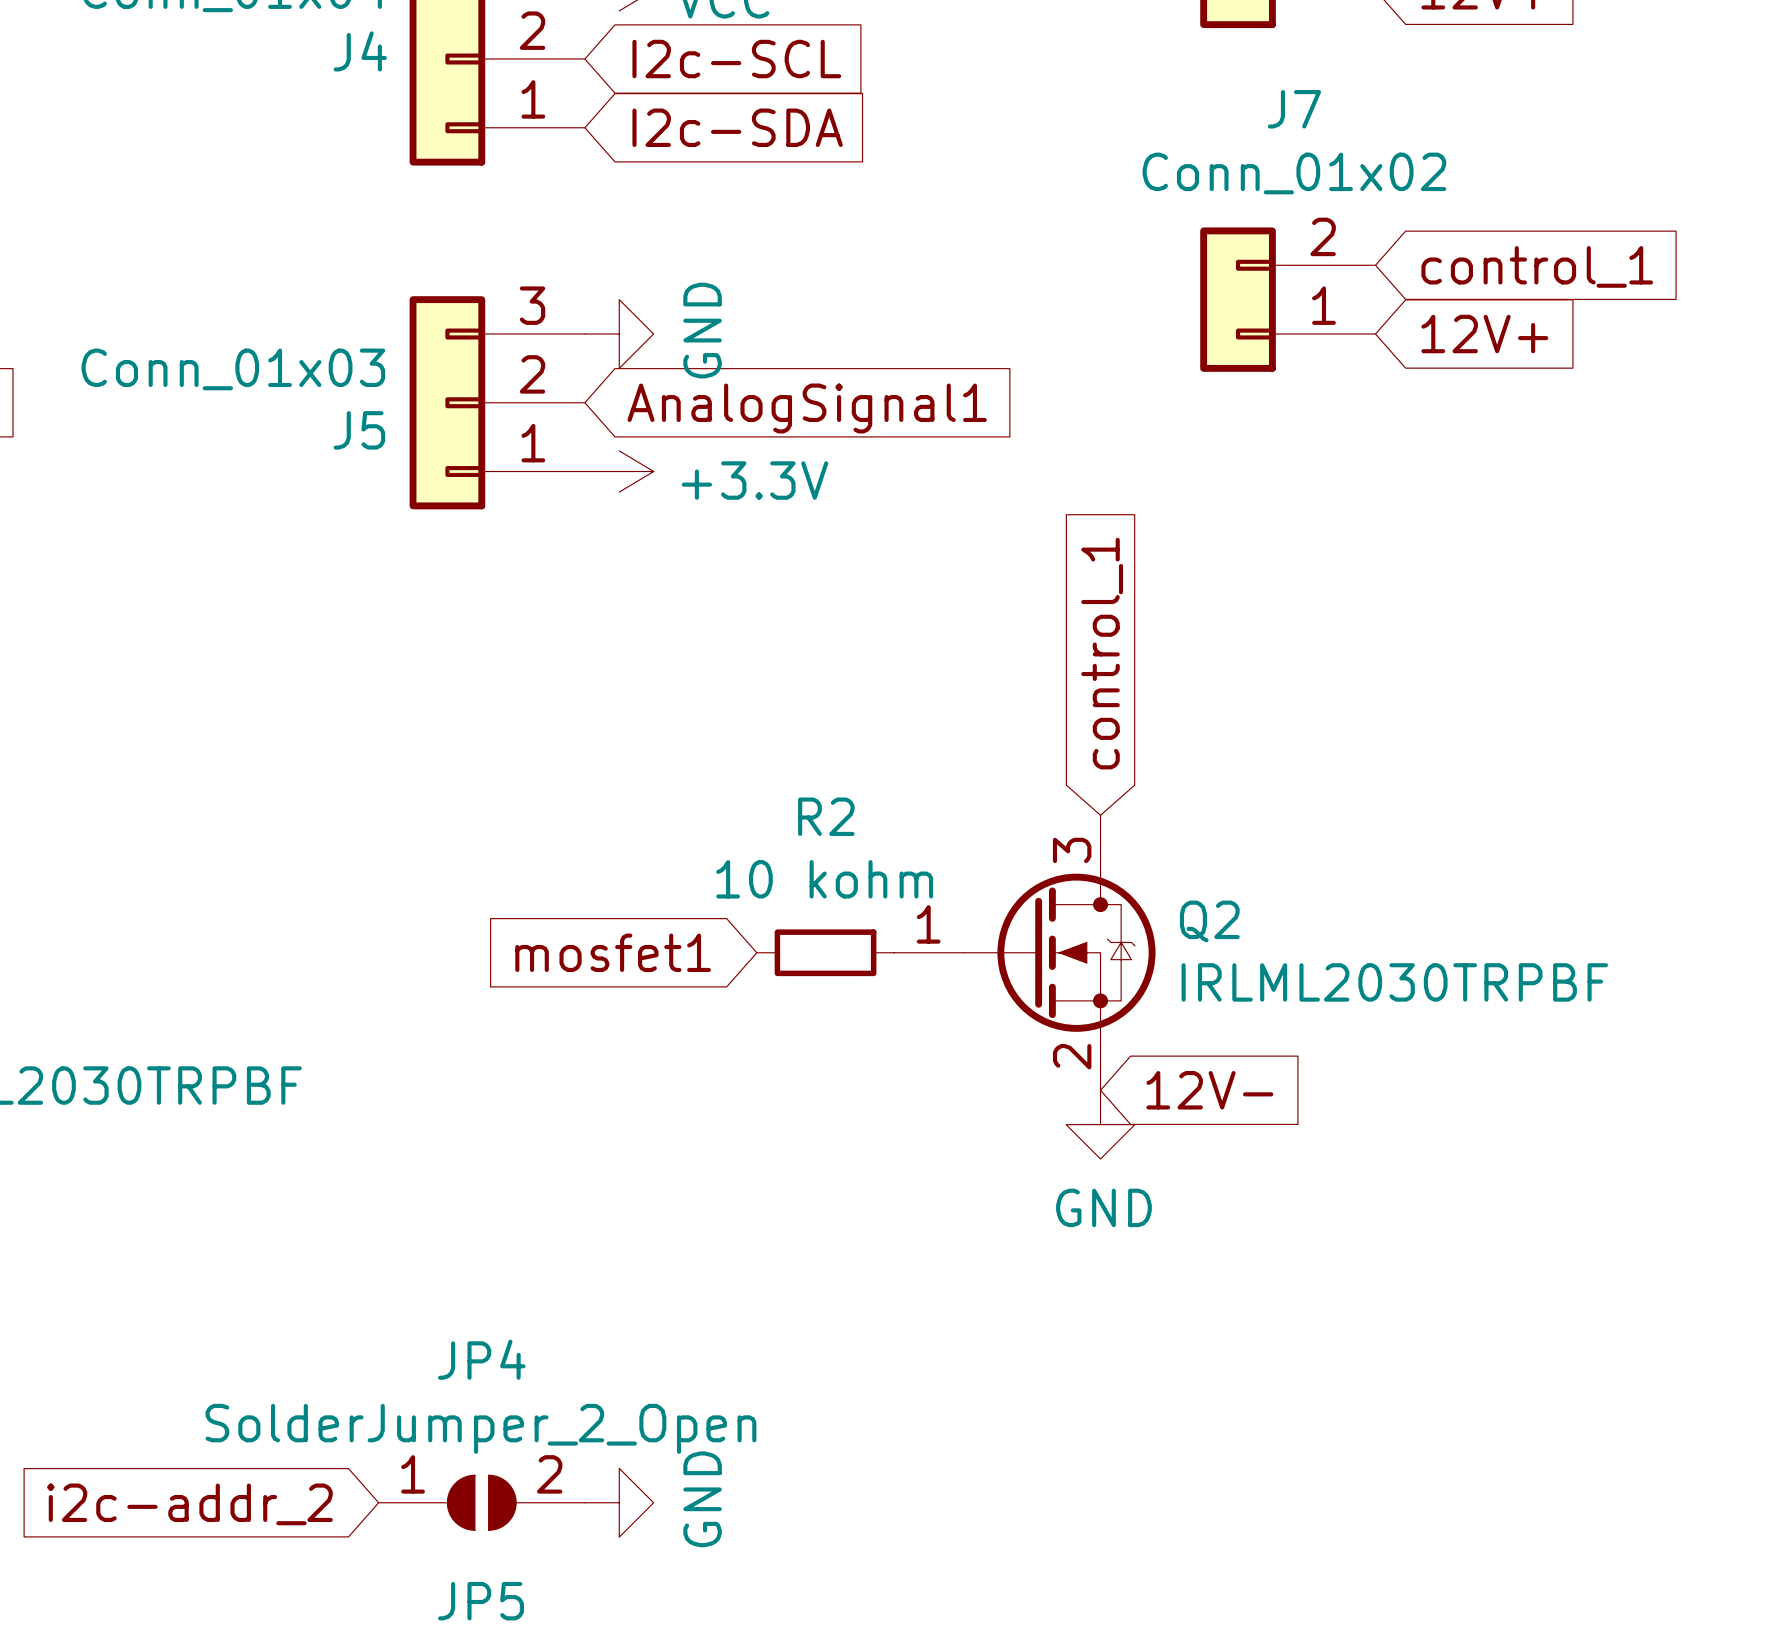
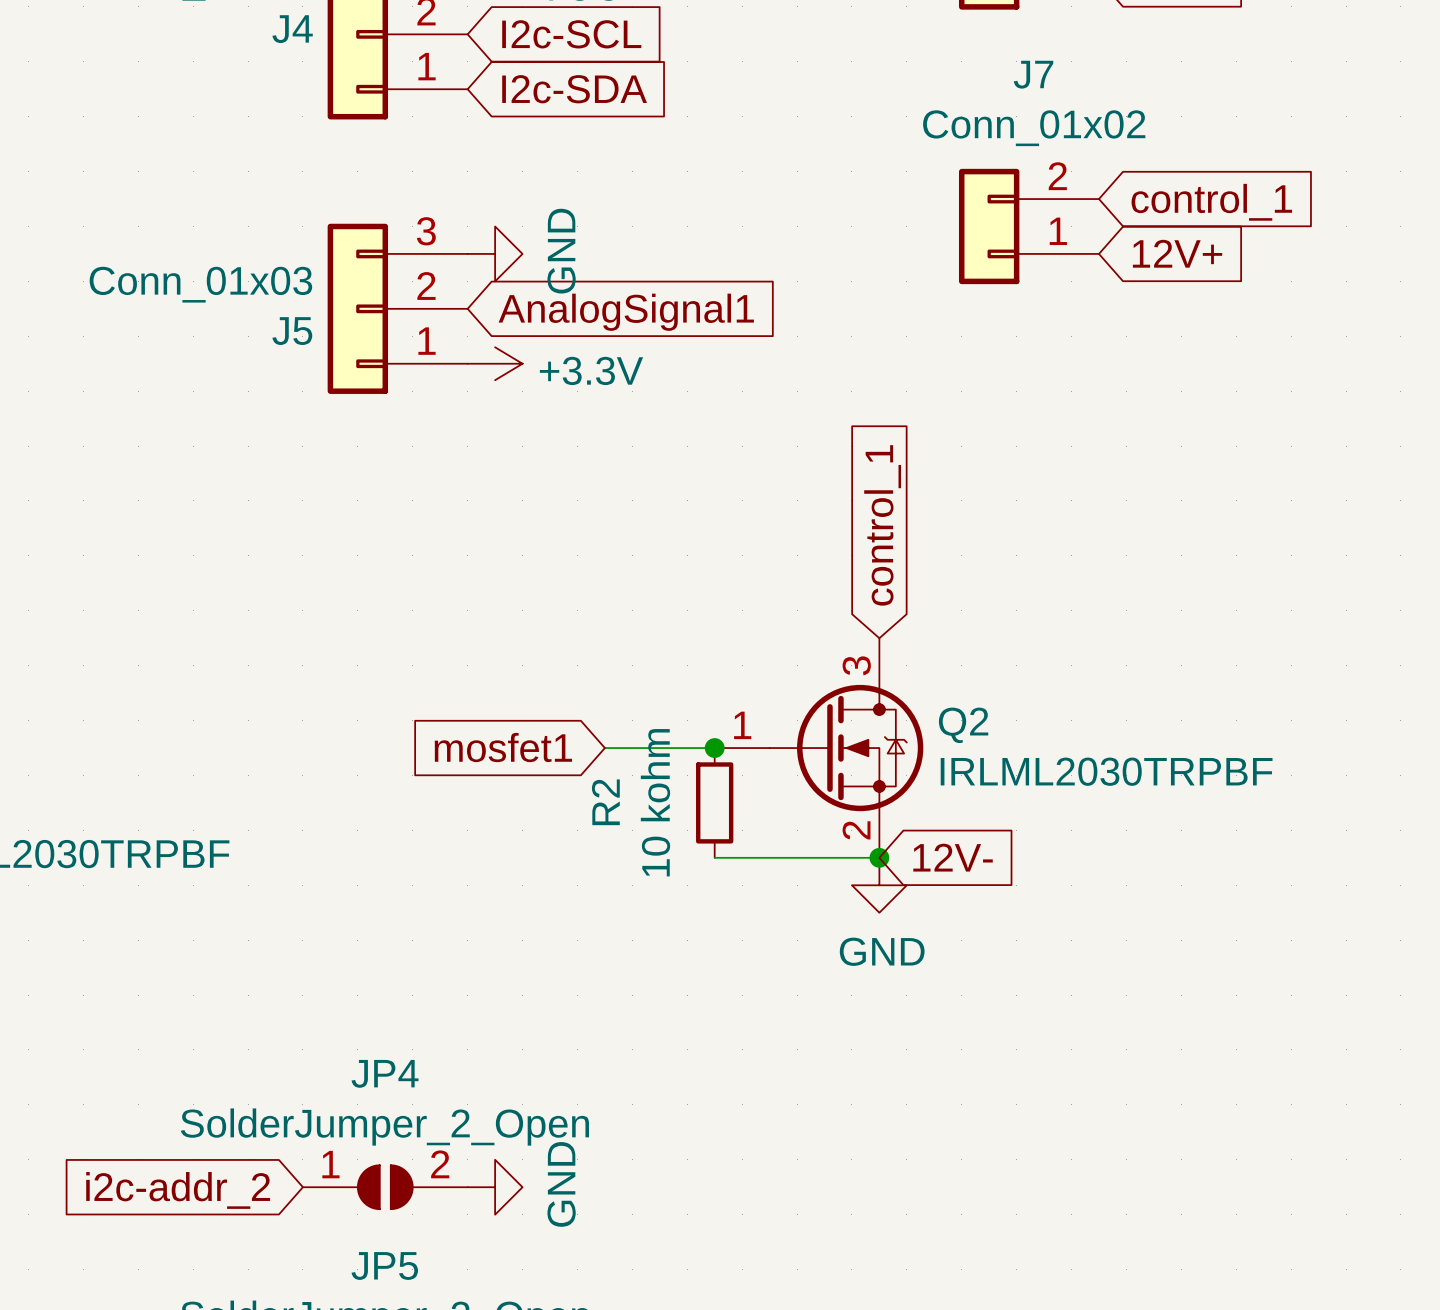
R2 name position: R2 (826, 816) -> R2 (605, 802)
R2 value position: 10 kohm (824, 879) -> 10 kohm (655, 802)
wire: none -> (604, 748) (714, 748)
R2 rotation: 0° (825, 952) -> 90° clockwise (714, 802)
R2 position: (825, 952) -> (714, 802)
junction: none -> (714, 748)
wire: none -> (714, 857) (879, 857)
junction: none -> (879, 857)

